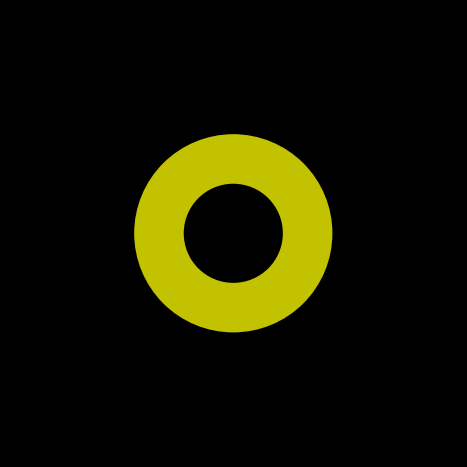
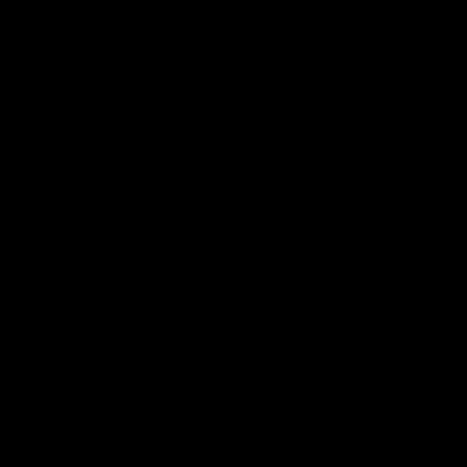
part: (233, 233) -> none

